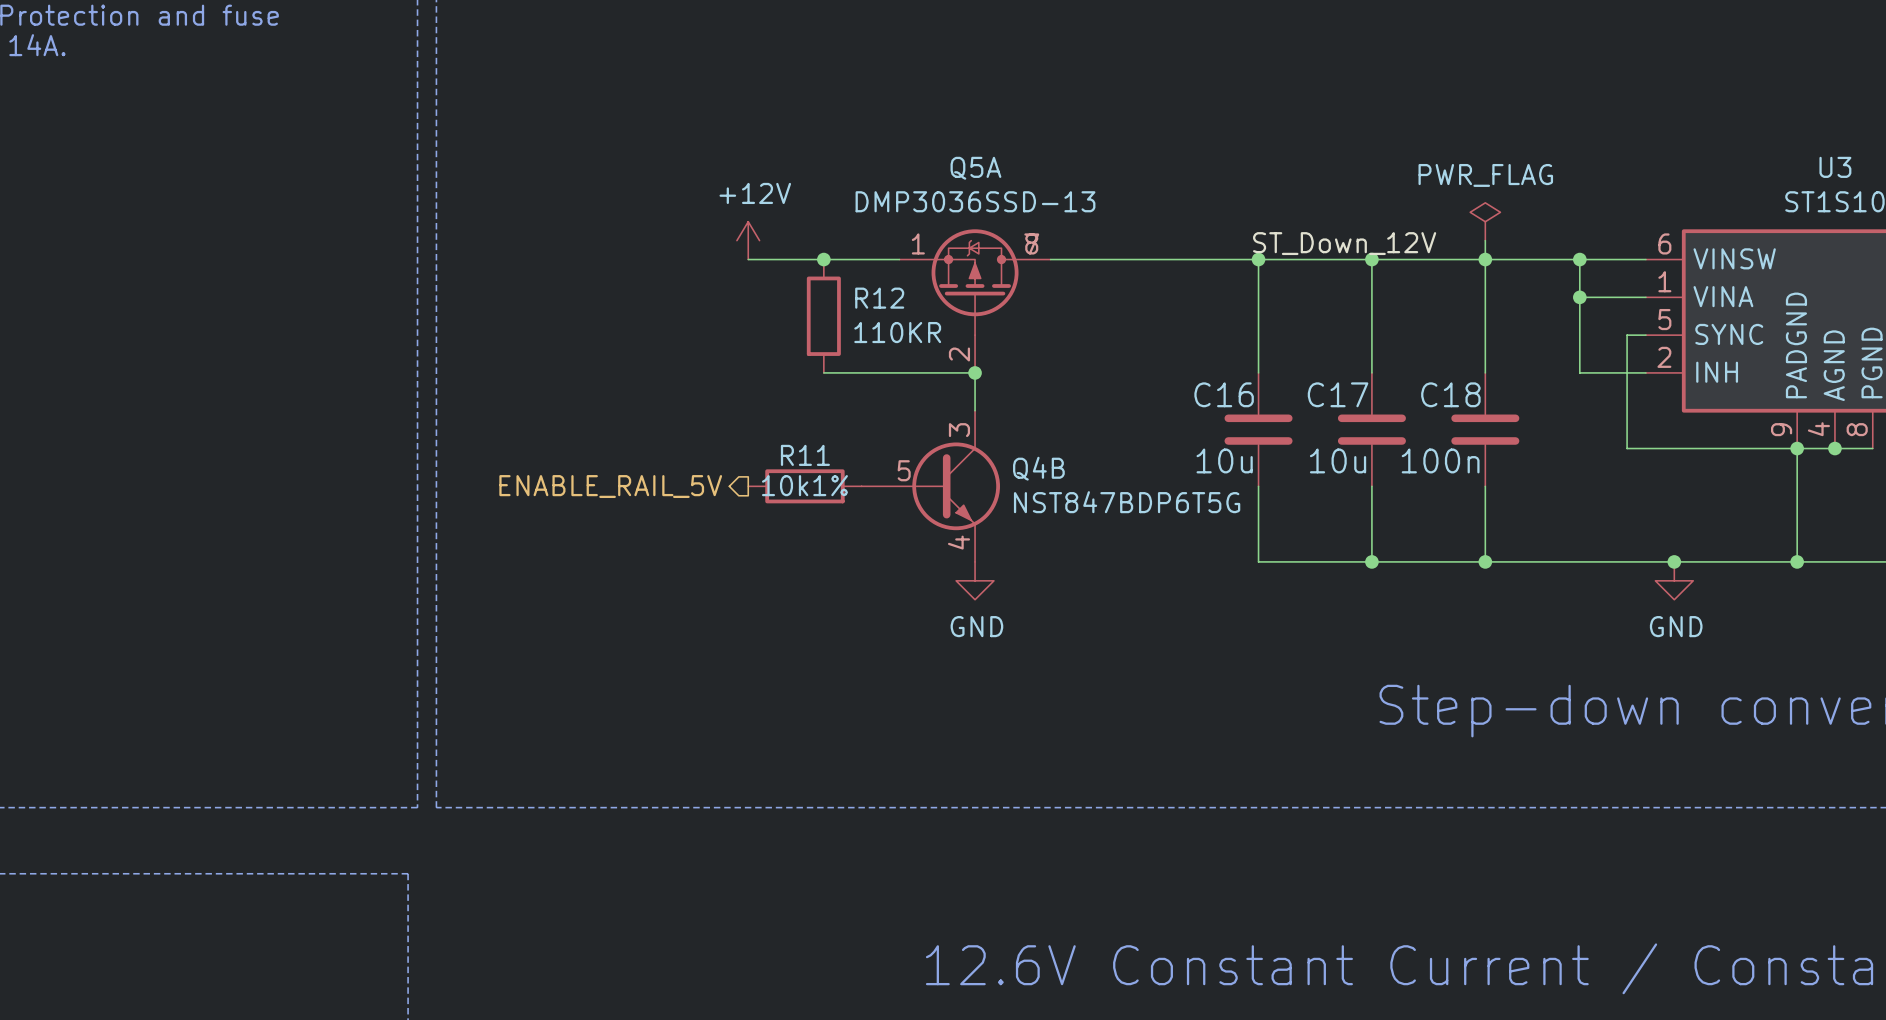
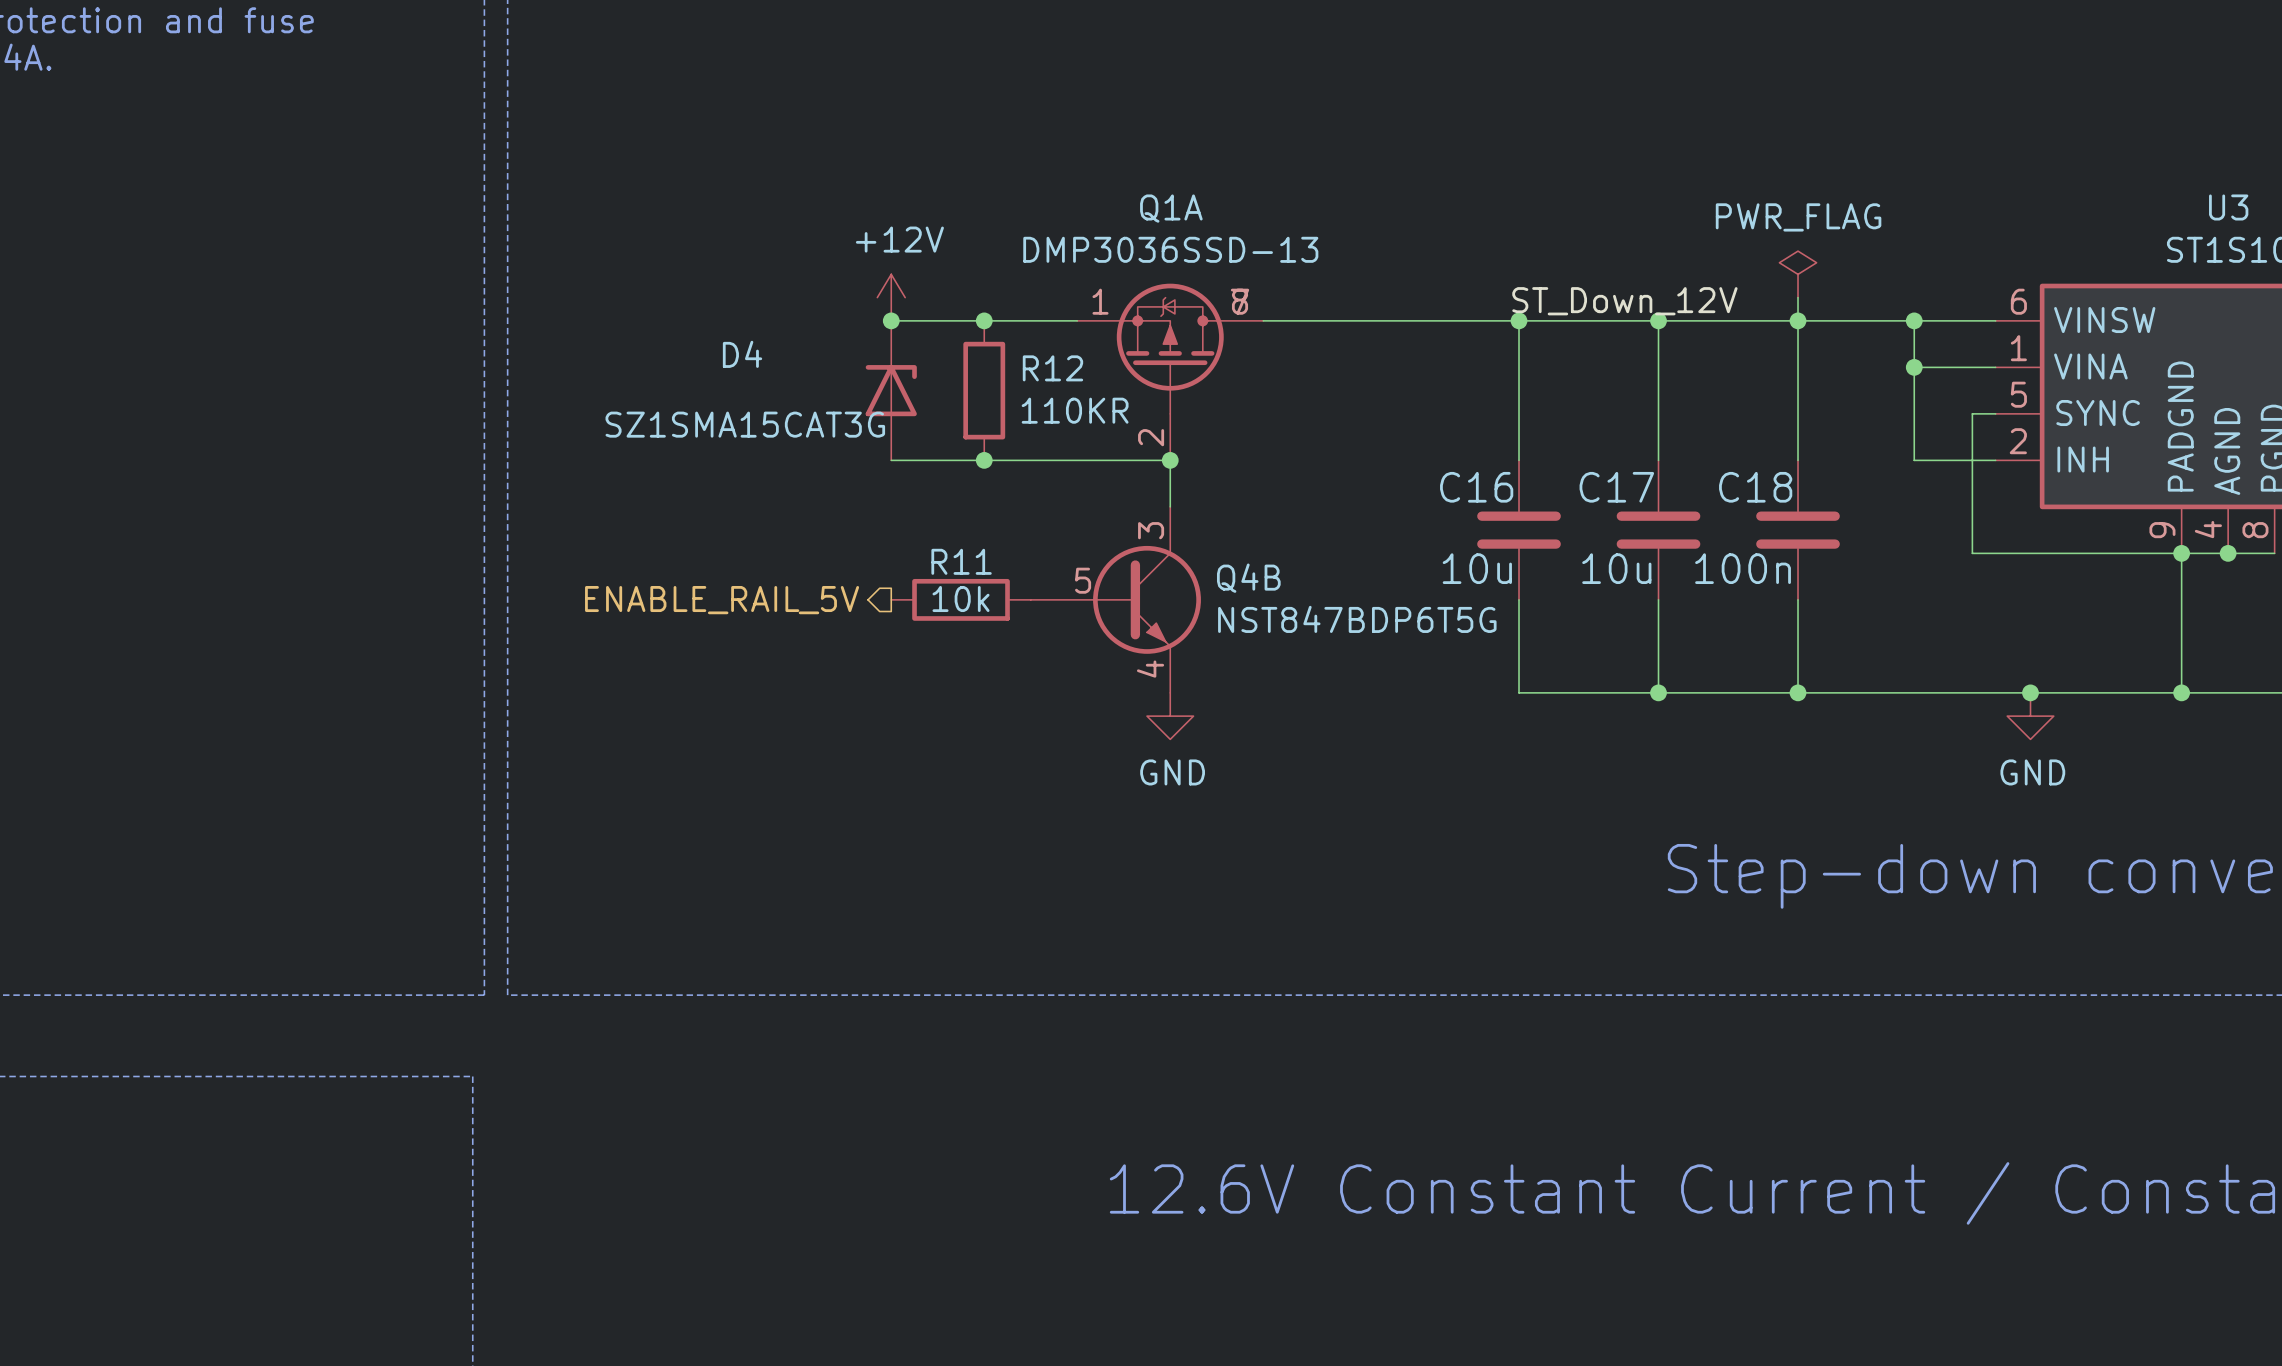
Q5A name: Q5A (975, 168) -> Q1A (1171, 208)
junction: none -> (891, 320)
D4: none -> SZ1SMA15CAT3G (891, 390)
wire: none -> (891, 460) (984, 460)
junction: none -> (984, 460)
R11 value: 10k1% (804, 485) -> 10k (961, 599)

